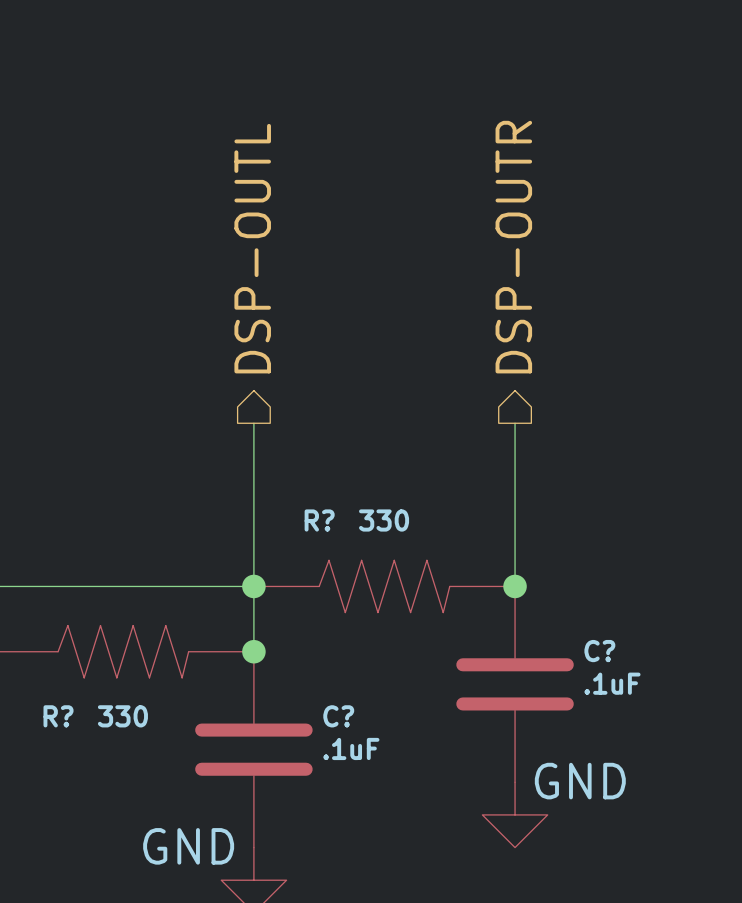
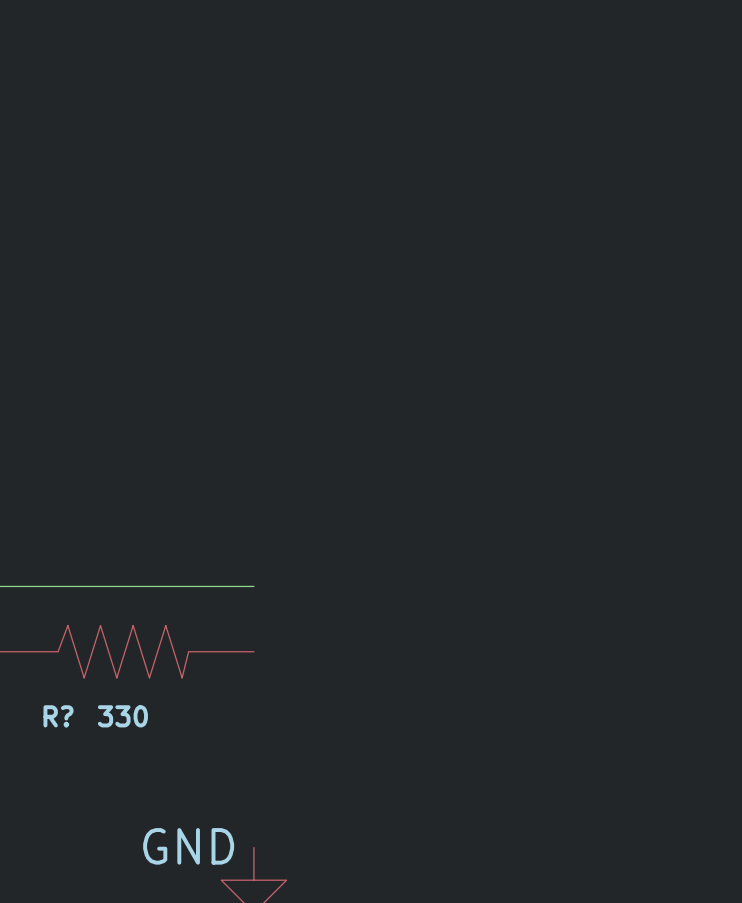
hierarchical label: DSP-OUTR (513, 247) -> none
hierarchical label: DSP-OUTL (252, 248) -> none
wire: (253, 423) (253, 651) -> none
wire: (515, 423) (515, 586) -> none
junction: (253, 586) -> none
R?: 330 (384, 586) -> none
junction: (515, 586) -> none
junction: (253, 651) -> none
C?: .1uF (515, 684) -> none
C?: .1uF (253, 749) -> none
power symbol: GND (515, 814) -> none

